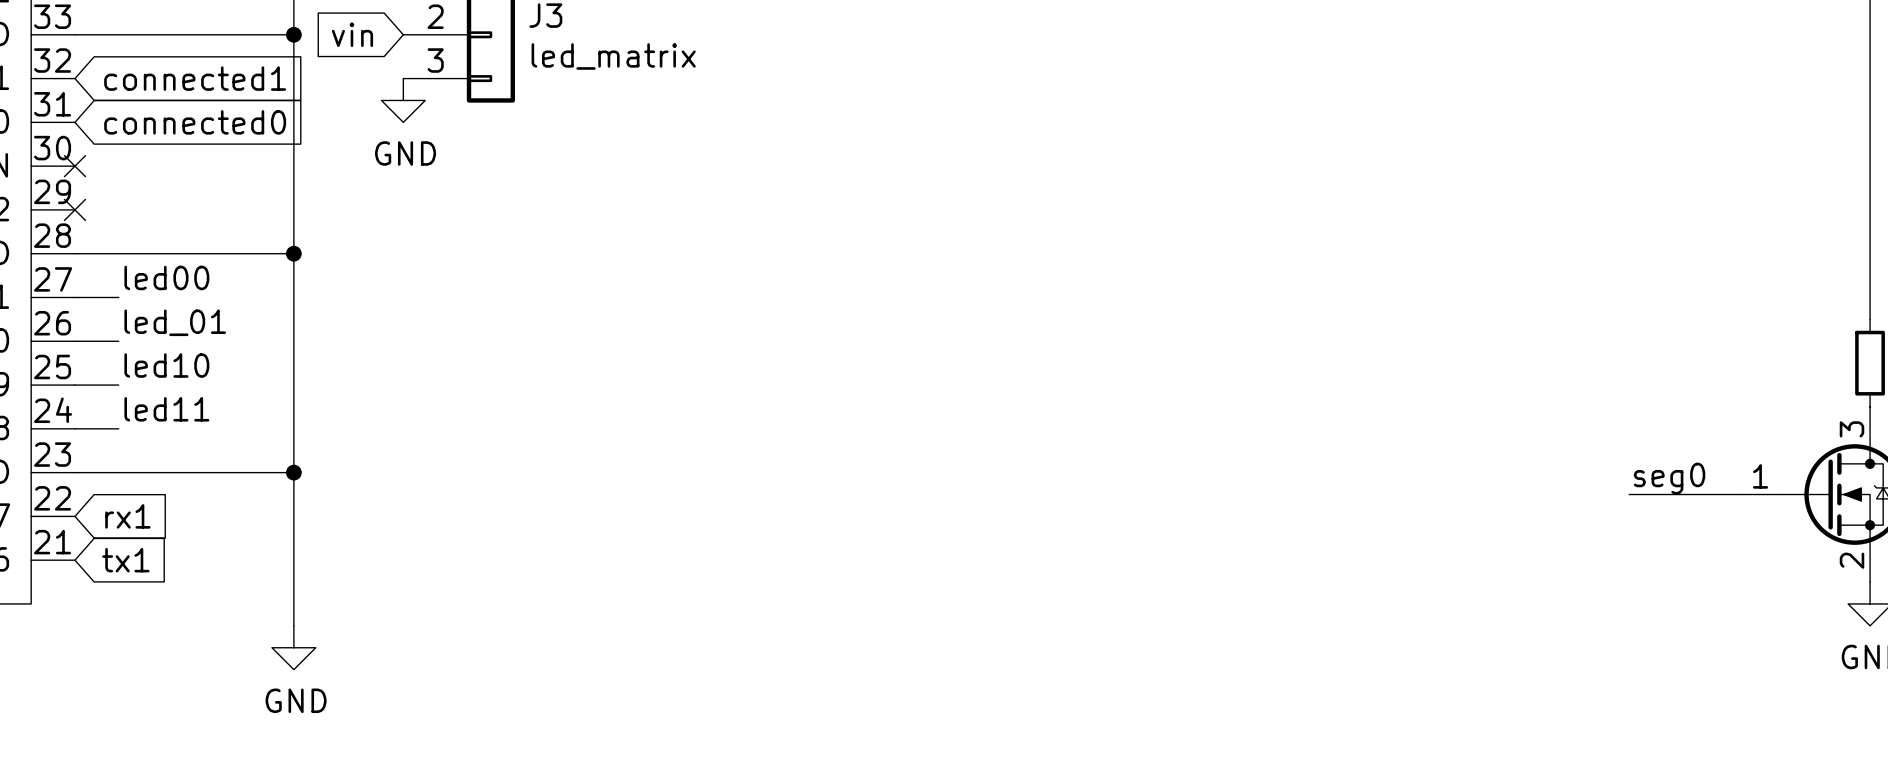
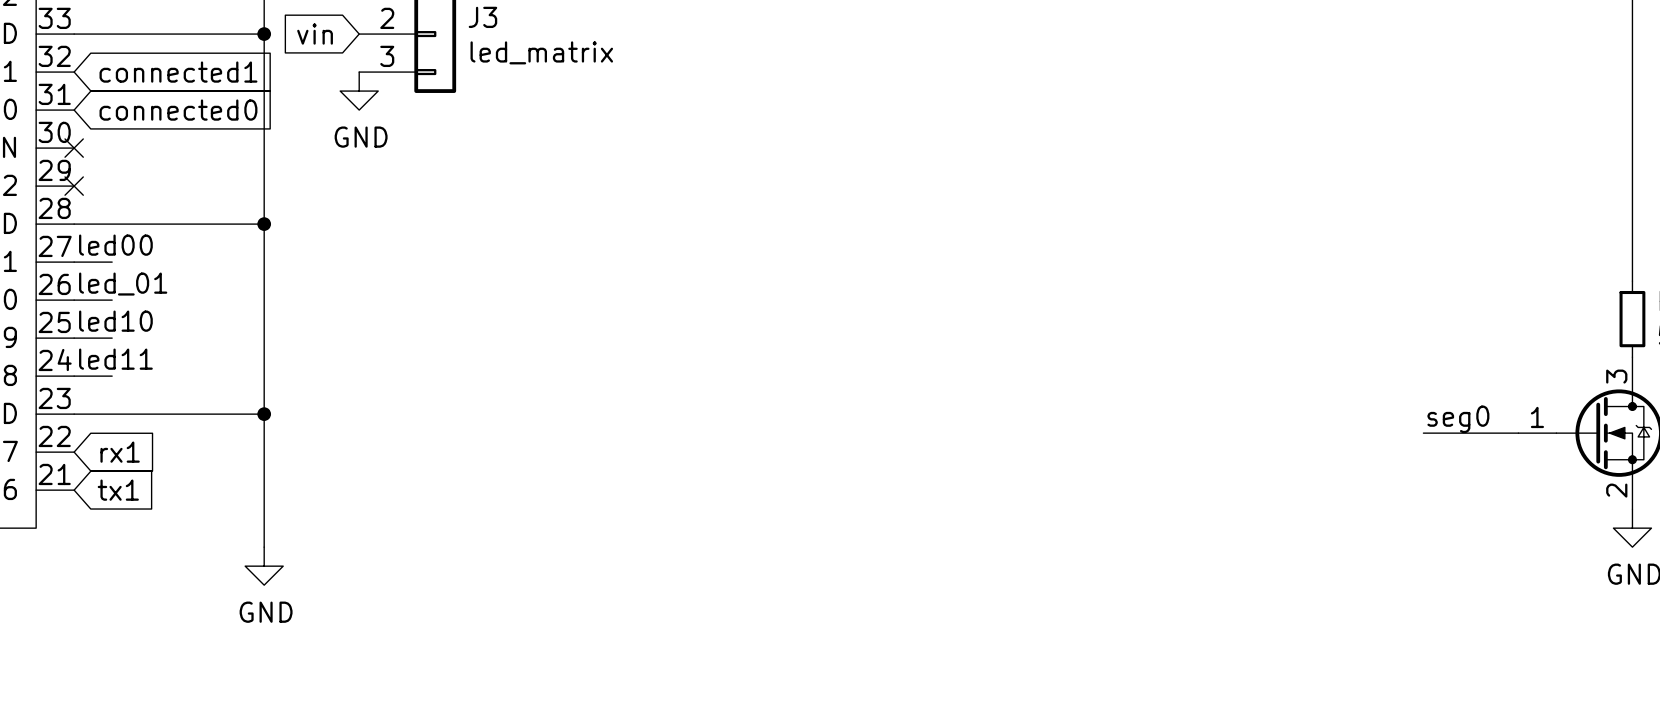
label position: led00 (166, 277) -> led00 (115, 245)
label position: led_01 (175, 322) -> led_01 (123, 284)
label position: led10 (166, 365) -> led10 (115, 321)
label position: led11 (166, 409) -> led11 (115, 359)

